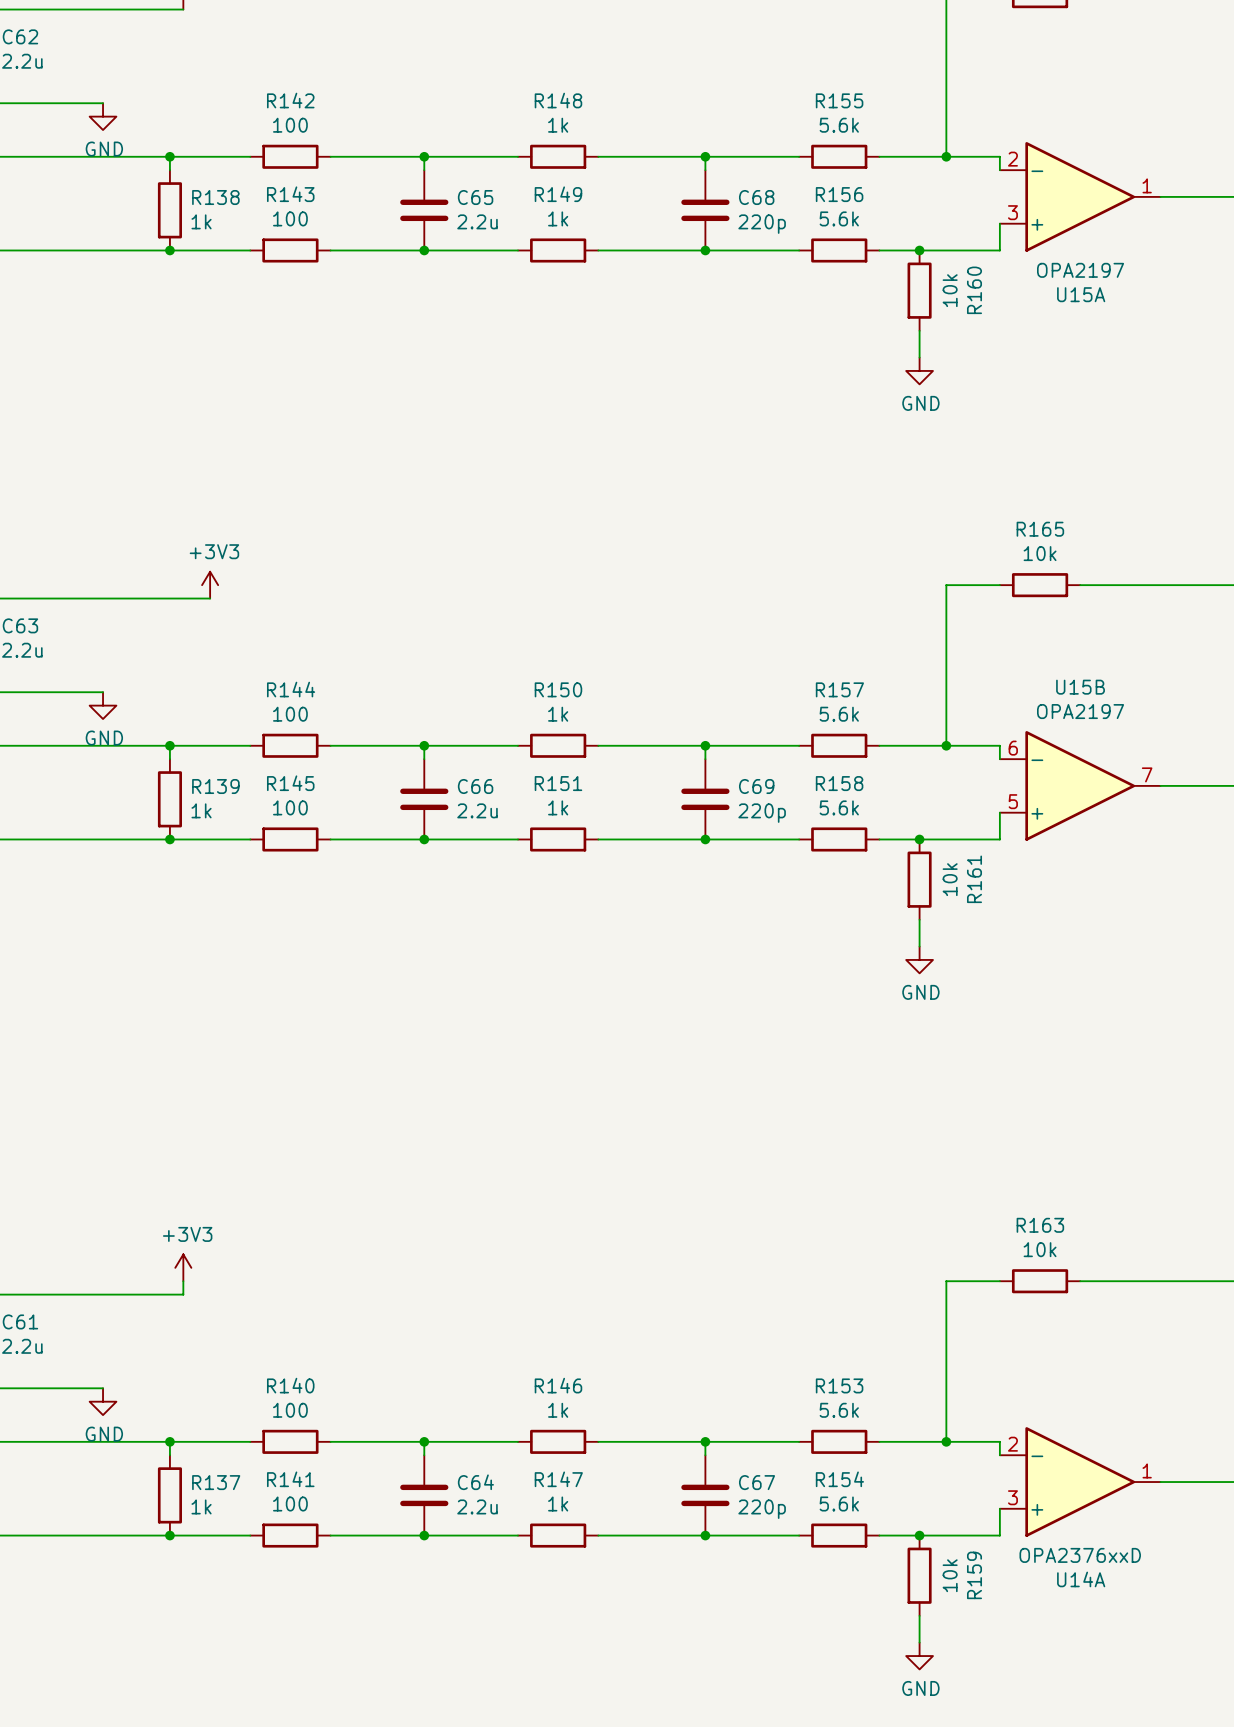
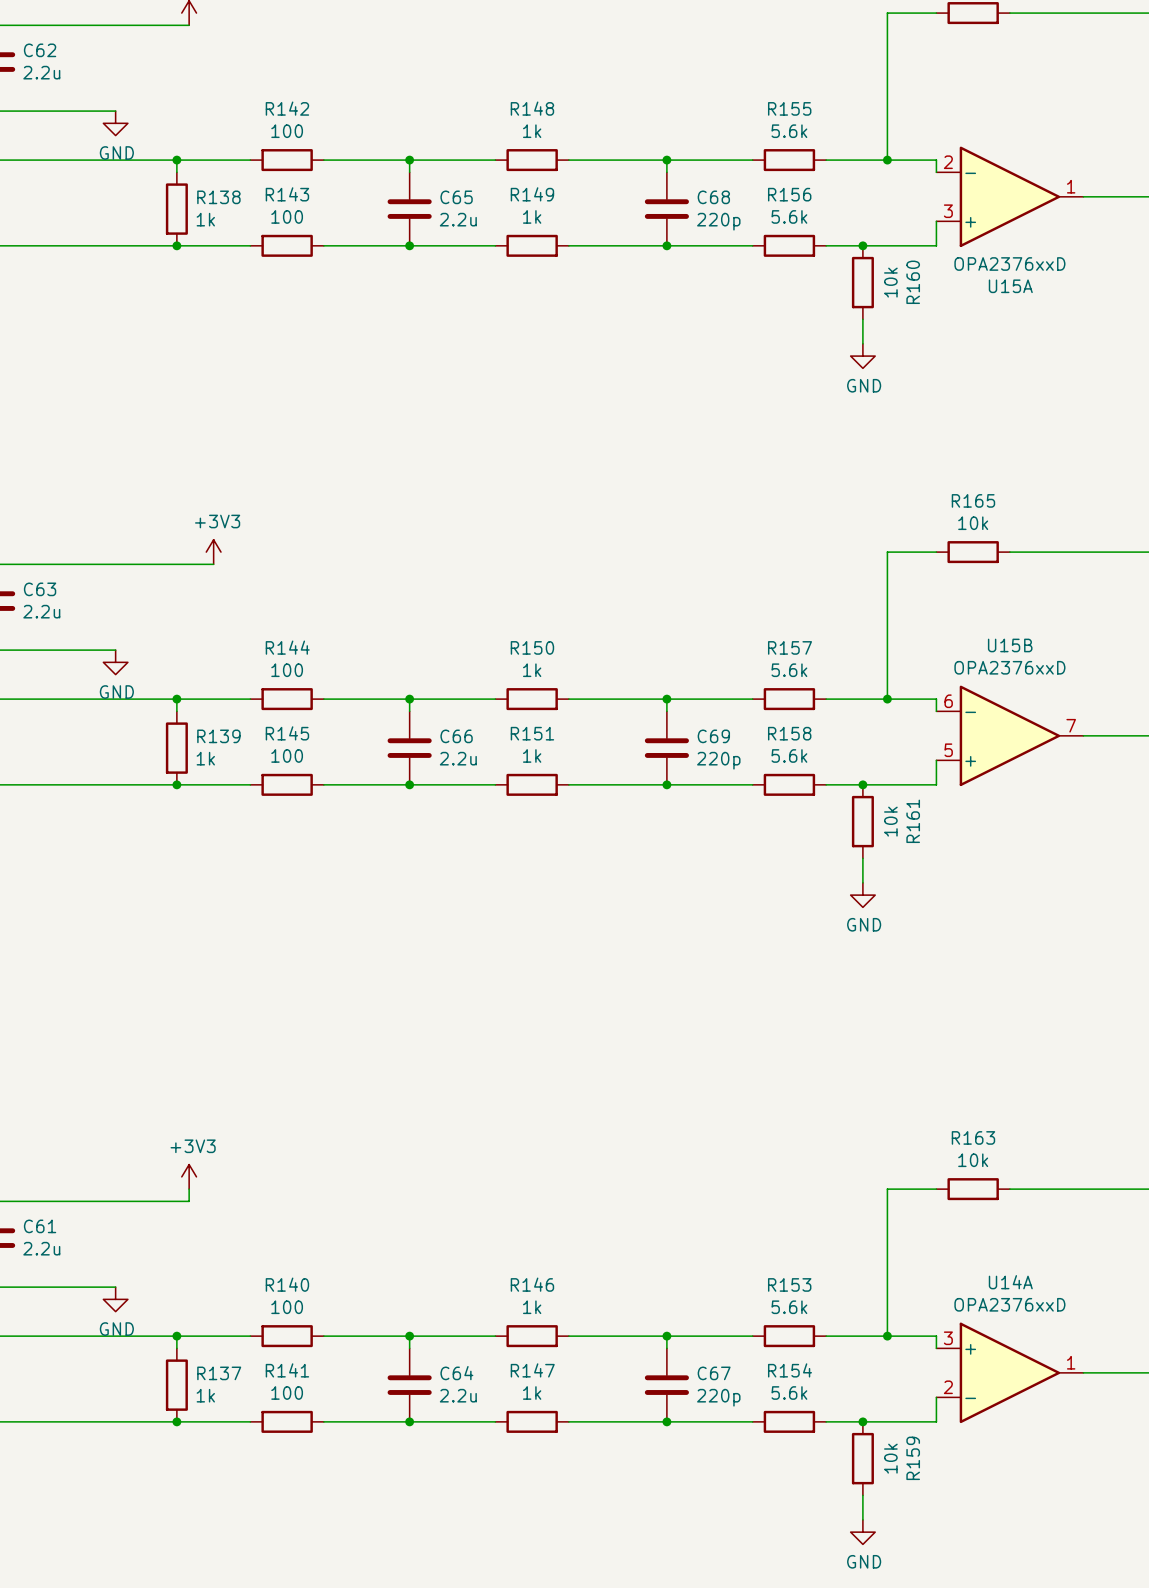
U15A value: OPA2197 (1080, 270) -> OPA2376xxD (1009, 263)
U15B value: OPA2197 (1080, 711) -> OPA2376xxD (1009, 667)
U14A flip: as is (1080, 1482) -> up-down (1009, 1372)

